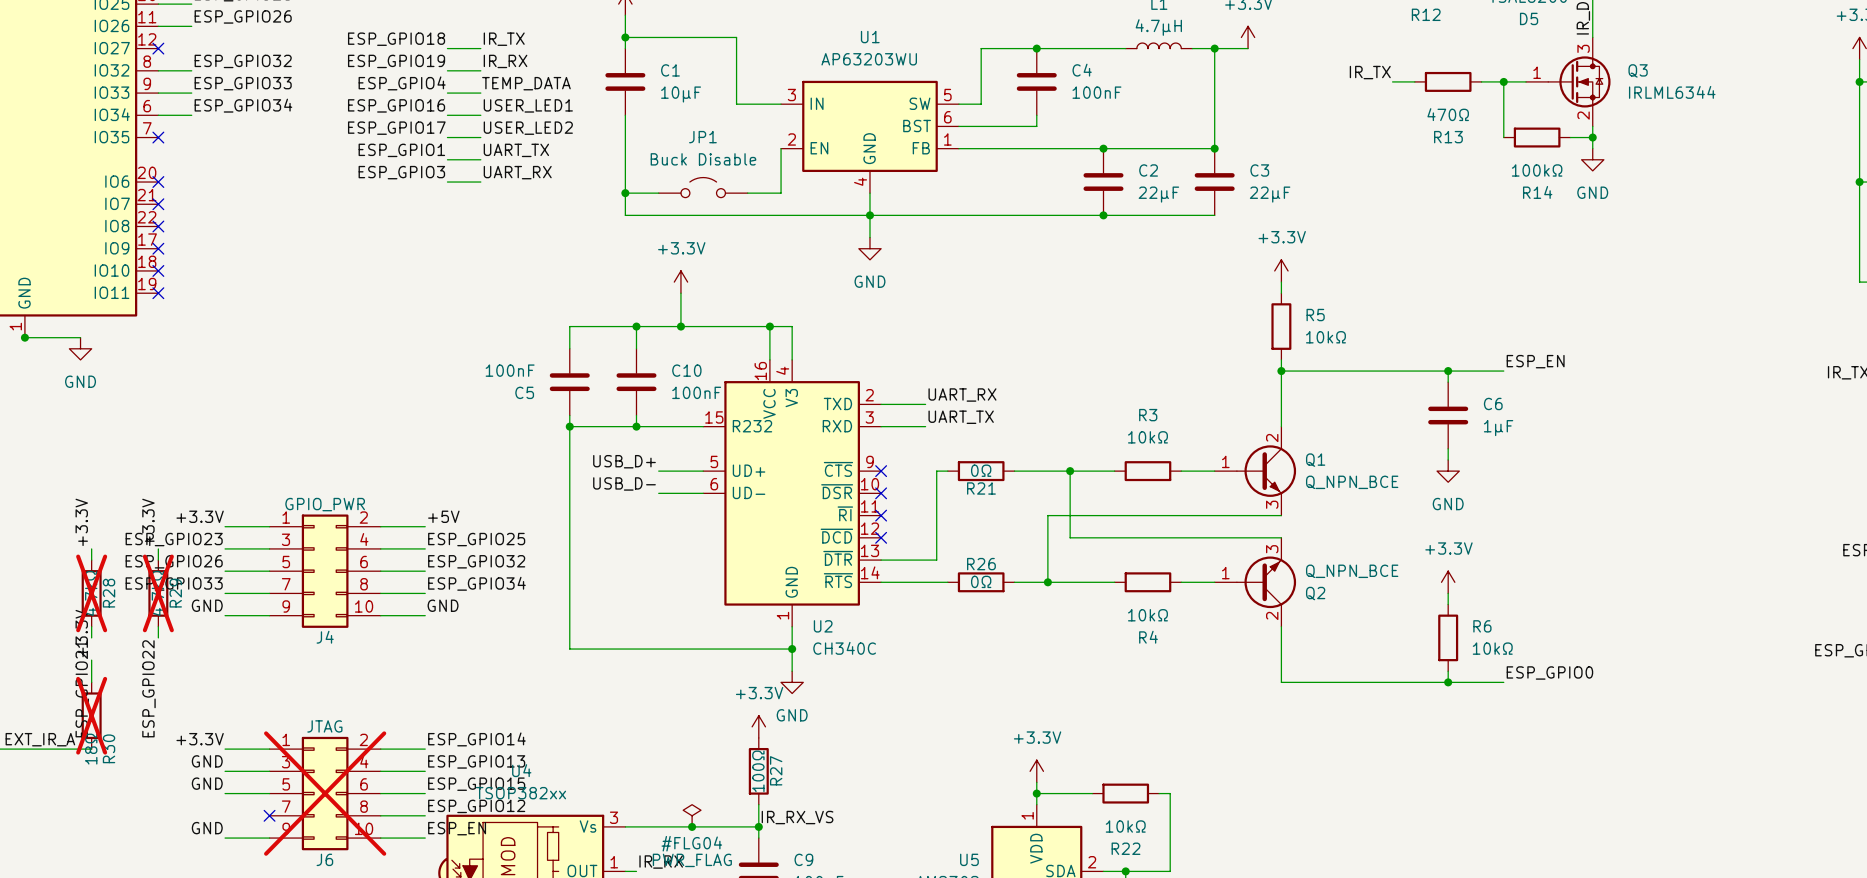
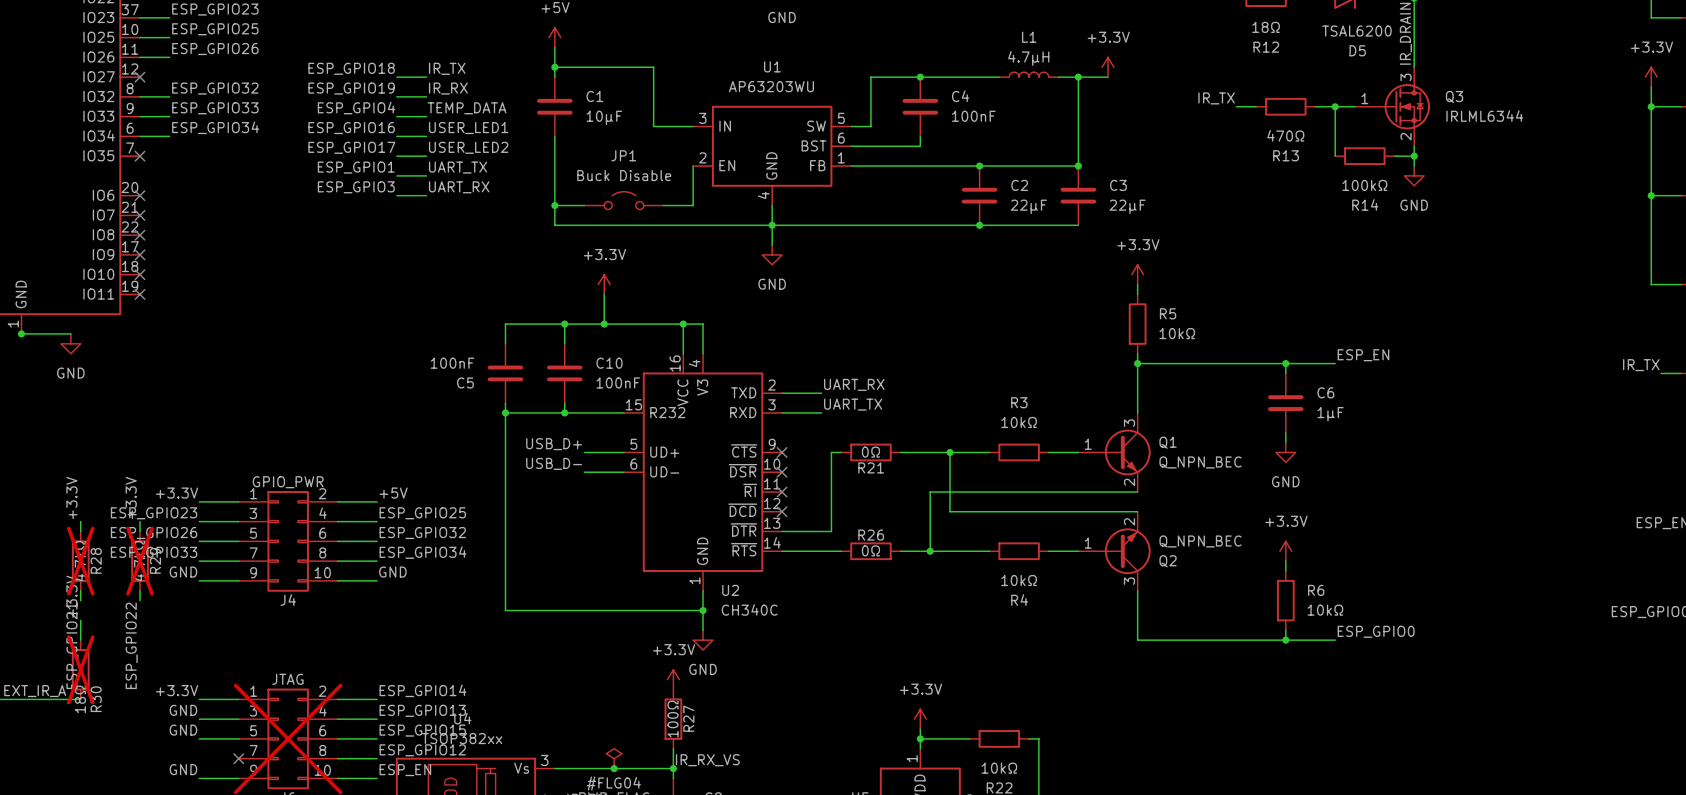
Q1 pin number: 2 (1272, 438) -> 3 (1129, 423)
Q1 value: Q_NPN_BCE (1352, 482) -> Q_NPN_BEC (1200, 462)
Q1 pin number: 3 (1272, 504) -> 2 (1129, 482)
Q2 pin number: 3 (1272, 549) -> 2 (1129, 521)
Q2 value: Q_NPN_BCE (1352, 571) -> Q_NPN_BEC (1200, 541)
Q2 pin number: 2 (1272, 615) -> 3 (1129, 581)

